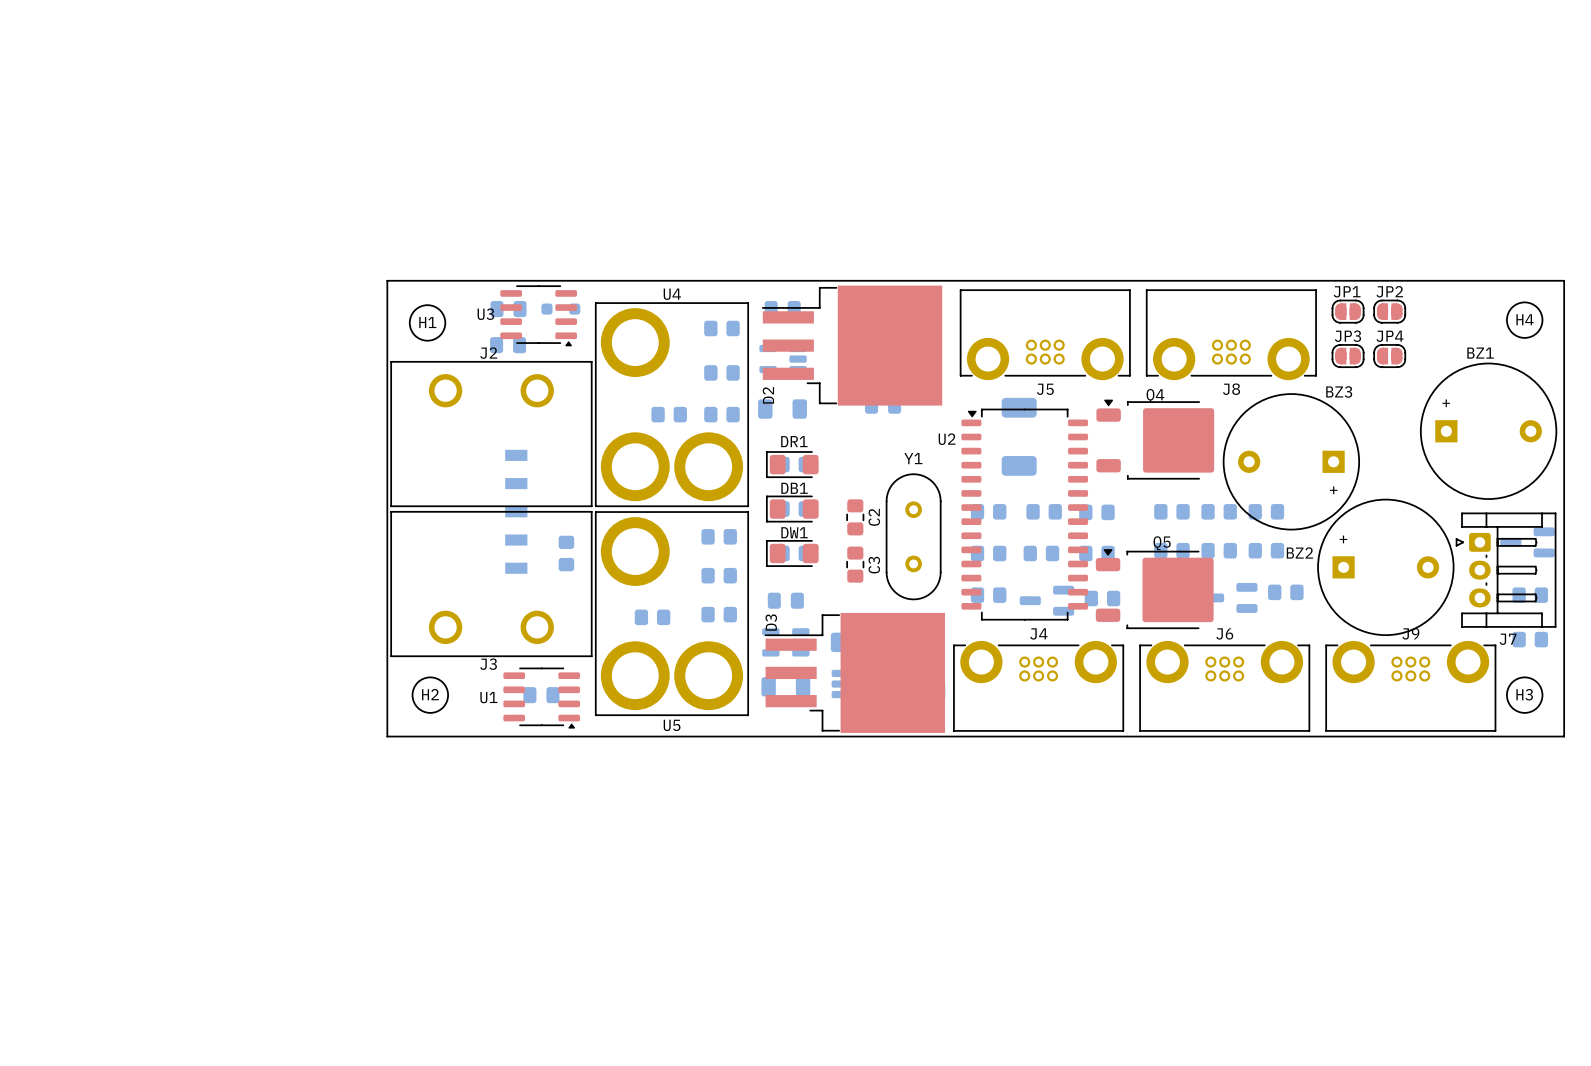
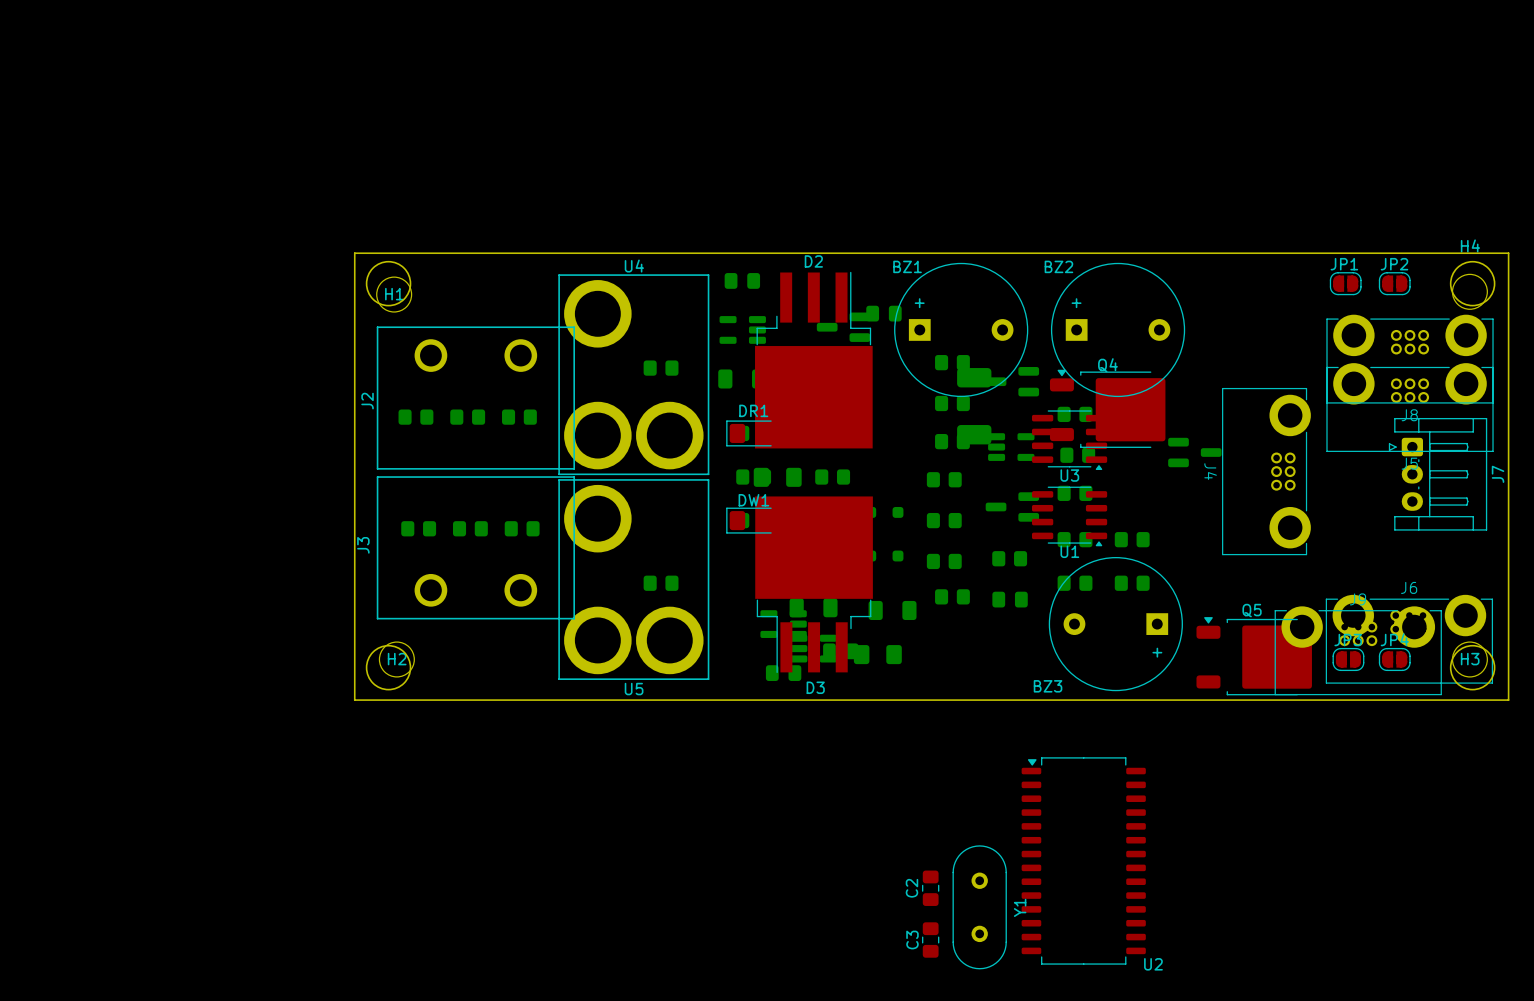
round board edge: none -> [365, 260, 412, 307]
round board edge: none -> [1449, 260, 1496, 307]
part: (508, 309) -> none
part: (560, 309) -> none
JP1 position: (1348, 311) -> (1345, 283)
JP2 position: (1389, 311) -> (1394, 283)
U3 name position: U3 (485, 314) -> U3 (1069, 475)
U3 position: (538, 315) -> (1069, 440)
H4 name position: H4 (1525, 319) -> H4 (1470, 245)
part: (721, 328) -> none
J5 rotation: 0° (1045, 334) -> 180° (1410, 407)
J5 position: (1045, 334) -> (1410, 407)
J8 rotation: 0° (1231, 334) -> 180° (1410, 359)
J8 position: (1231, 334) -> (1410, 359)
part: none -> (883, 313)
part: (508, 345) -> none
D2 rotation: 0° (852, 345) -> 90° clockwise (813, 360)
J2 name rotation: 0° (488, 353) -> 90° counterclockwise (367, 401)
J2 name position: J2 (488, 353) -> J2 (367, 401)
BZ1 name position: BZ1 (1480, 353) -> BZ1 (907, 266)
JP3 position: (1348, 356) -> (1348, 659)
JP4 position: (1389, 356) -> (1394, 659)
part: (721, 372) -> none
BZ3 name position: BZ3 (1339, 391) -> BZ3 (1048, 686)
part: none -> (952, 362)
D2 name position: D2 (768, 395) -> D2 (813, 261)
part: none -> (661, 368)
part: none -> (1012, 381)
part: (669, 414) -> none
part: (721, 414) -> none
BZ1 position: (1488, 431) -> (961, 329)
J2 position: (491, 434) -> (475, 398)
part: none -> (952, 403)
U2 name position: U2 (947, 439) -> U2 (1153, 964)
part: none -> (1075, 414)
part: none -> (415, 417)
part: none -> (467, 417)
part: none -> (519, 417)
Y1 name rotation: 0° (913, 458) -> 90° counterclockwise (1020, 907)
Y1 name position: Y1 (913, 458) -> Y1 (1020, 907)
BZ3 position: (1291, 461) -> (1115, 624)
part: none -> (952, 441)
part: none -> (1011, 447)
part: none -> (1194, 452)
part: none -> (1077, 455)
DB1 side: top (792, 509) -> bottom (777, 477)
part: none -> (832, 477)
part: (516, 511) -> none
part: (1044, 511) -> none
part: (1171, 511) -> none
part: (1219, 511) -> none
part: (1266, 511) -> none
part: (1096, 512) -> none
U2 position: (1024, 514) -> (1083, 860)
C2 position: (855, 517) -> (930, 888)
C2 name position: C2 (874, 517) -> C2 (911, 888)
part: none -> (1075, 493)
part: (719, 536) -> none
Y1 position: (913, 536) -> (979, 907)
part: (1527, 542) -> none
Q5 name position: Q5 (1162, 543) -> Q5 (1252, 610)
part: none -> (884, 512)
part: (1171, 550) -> none
part: (1219, 550) -> none
part: (1266, 550) -> none
BZ2 name position: BZ2 (1299, 552) -> BZ2 (1058, 266)
part rotation: 0° (566, 553) -> 90° clockwise (522, 528)
part: (1041, 553) -> none
part: (1096, 553) -> none
part: none -> (418, 528)
part: none -> (470, 528)
C3 position: (855, 564) -> (930, 940)
C3 name position: C3 (874, 565) -> C3 (912, 940)
BZ2 position: (1385, 567) -> (1118, 329)
J7 position: (1506, 570) -> (1438, 474)
part: none -> (1075, 539)
part: none -> (1132, 539)
part: (719, 575) -> none
J3 position: (491, 584) -> (475, 547)
part: none -> (884, 556)
Q5 position: (1154, 589) -> (1254, 656)
part: none -> (1009, 558)
part: (1285, 592) -> none
part: (1530, 595) -> none
part: (1230, 597) -> none
part: (1102, 598) -> none
part: (785, 600) -> none
part position: (1046, 600) -> (1012, 506)
part position: (719, 614) -> (661, 583)
part: (652, 617) -> none
part: none -> (1075, 583)
part: none -> (1132, 583)
D3 name position: D3 (771, 622) -> D3 (815, 687)
part: none -> (952, 596)
J4 name position: J4 (1038, 633) -> J4 (1210, 471)
part: none -> (1010, 599)
J7 name rotation: 0° (1508, 639) -> 90° counterclockwise (1498, 474)
J7 name position: J7 (1508, 639) -> J7 (1498, 474)
part: (1530, 639) -> none
part position: (785, 642) -> (783, 624)
J3 name rotation: 0° (488, 664) -> 90° counterclockwise (363, 545)
J3 name position: J3 (488, 664) -> J3 (363, 545)
D3 rotation: 0° (854, 672) -> 90° counterclockwise (814, 584)
round board edge: none -> [365, 644, 412, 691]
round board edge: none -> [1449, 644, 1496, 691]
part position: (785, 686) -> (892, 610)
part: none -> (840, 651)
J4 rotation: 0° (1038, 686) -> 90° clockwise (1266, 471)
J4 position: (1038, 686) -> (1266, 471)
J6 position: (1224, 686) -> (1409, 639)
part: (541, 695) -> none
U1 name position: U1 (488, 697) -> U1 (1069, 551)
U1 position: (541, 698) -> (1069, 516)
part: none -> (783, 673)

